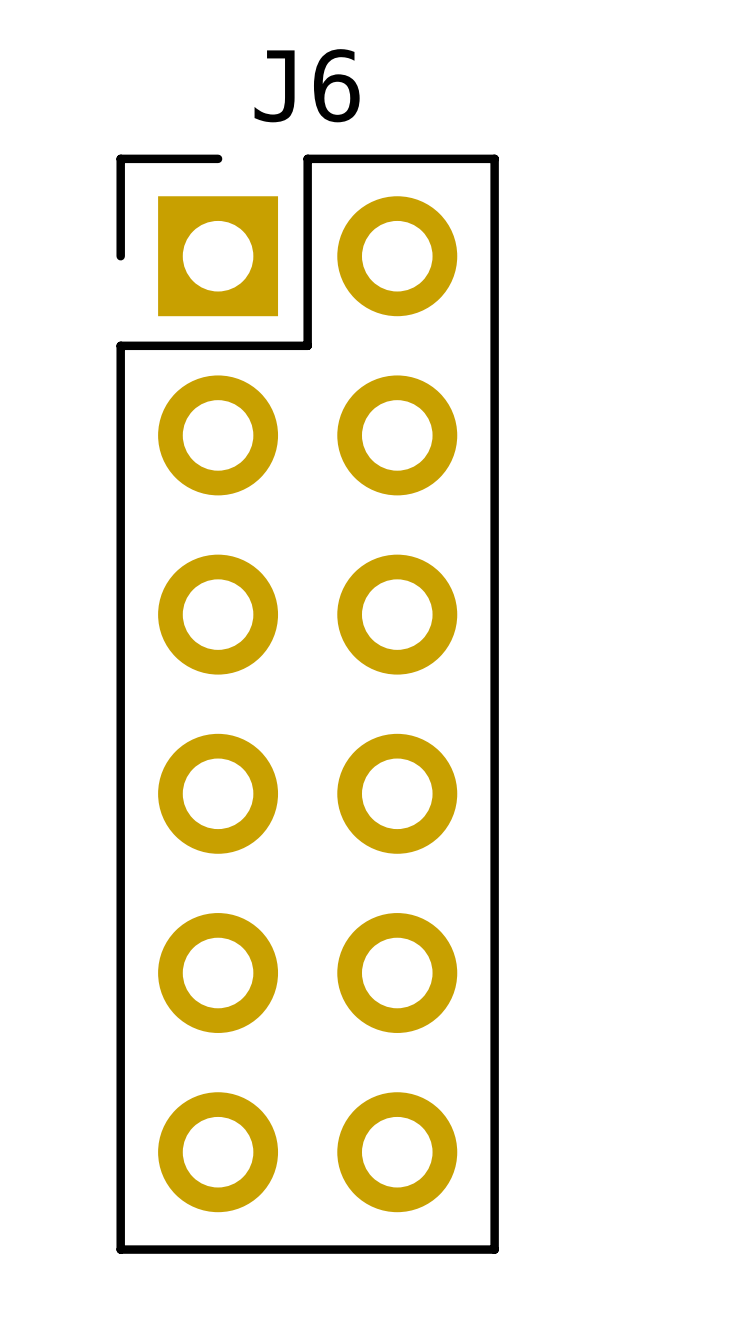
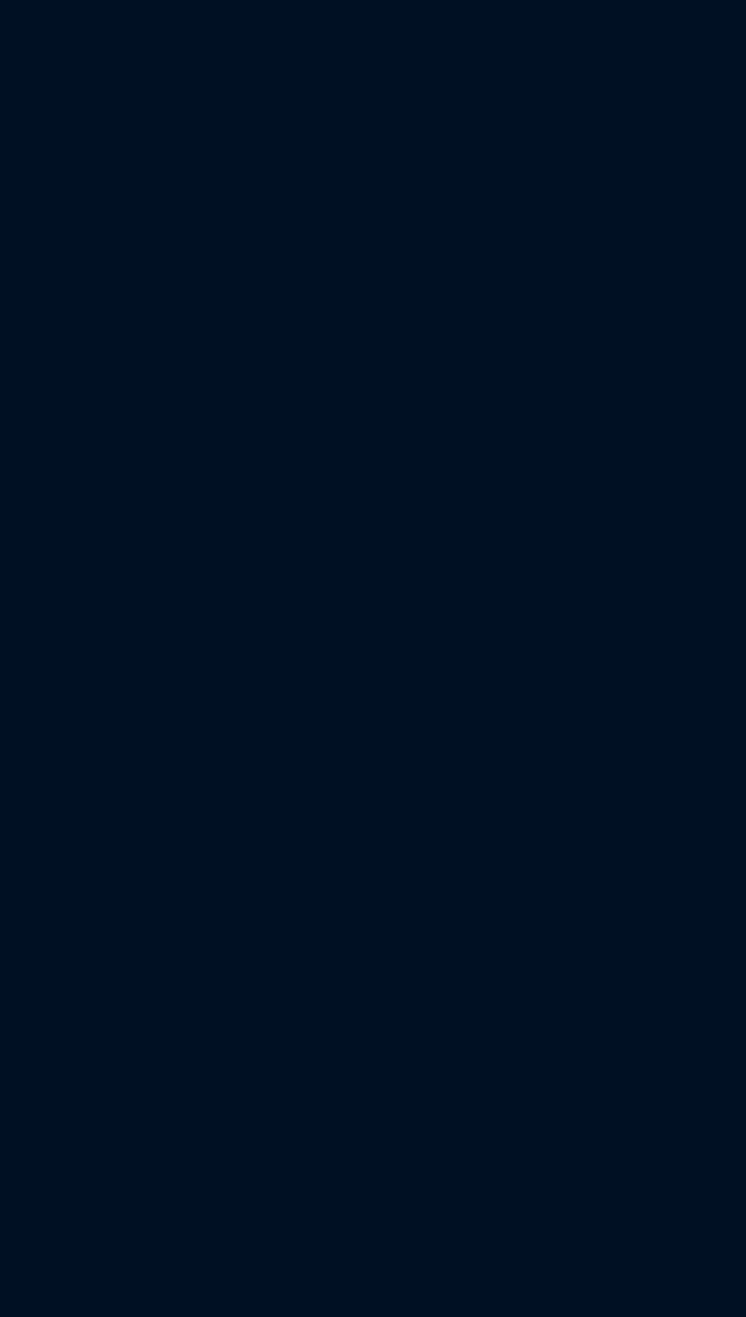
J6: (307, 704) -> none

